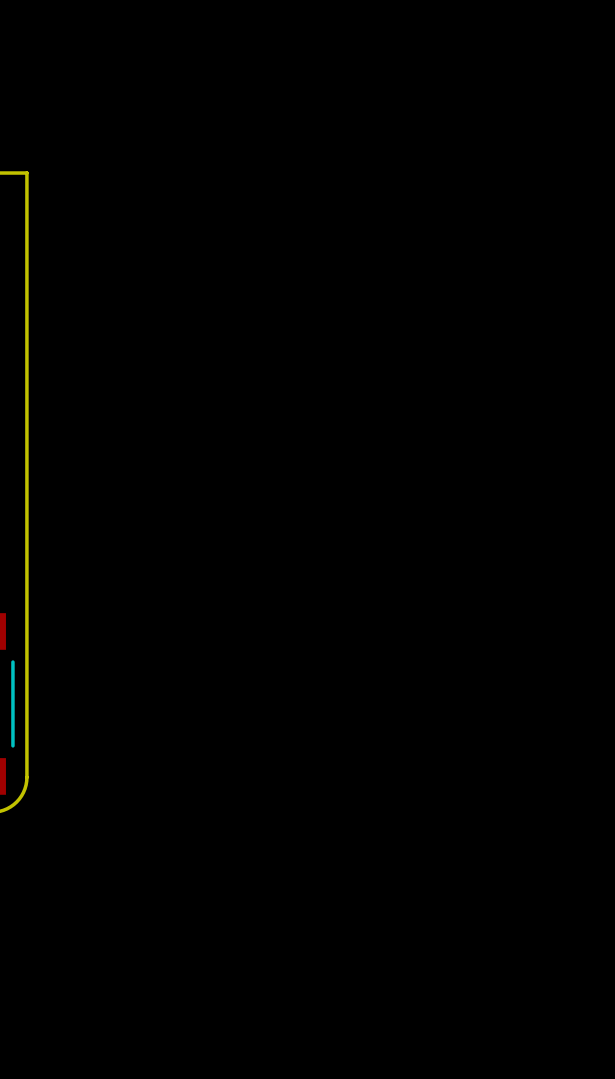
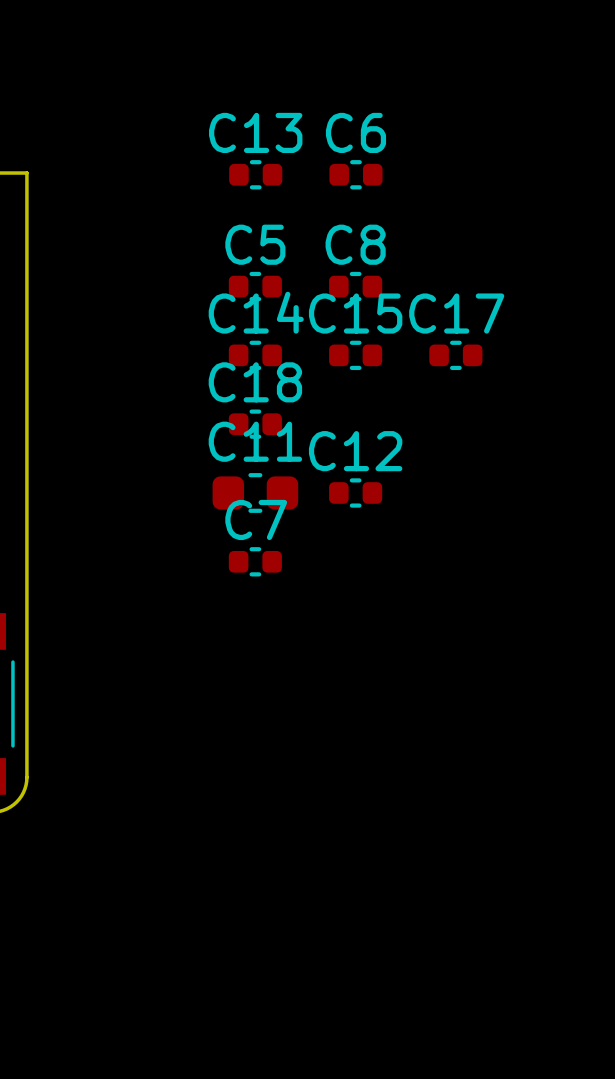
C13: none -> (255, 174)
C6: none -> (355, 174)
C5: none -> (255, 286)
C8: none -> (355, 286)
C14: none -> (255, 355)
C15: none -> (355, 355)
C17: none -> (455, 355)
C18: none -> (255, 424)
C11: none -> (255, 492)
C12: none -> (355, 492)
C7: none -> (255, 561)

